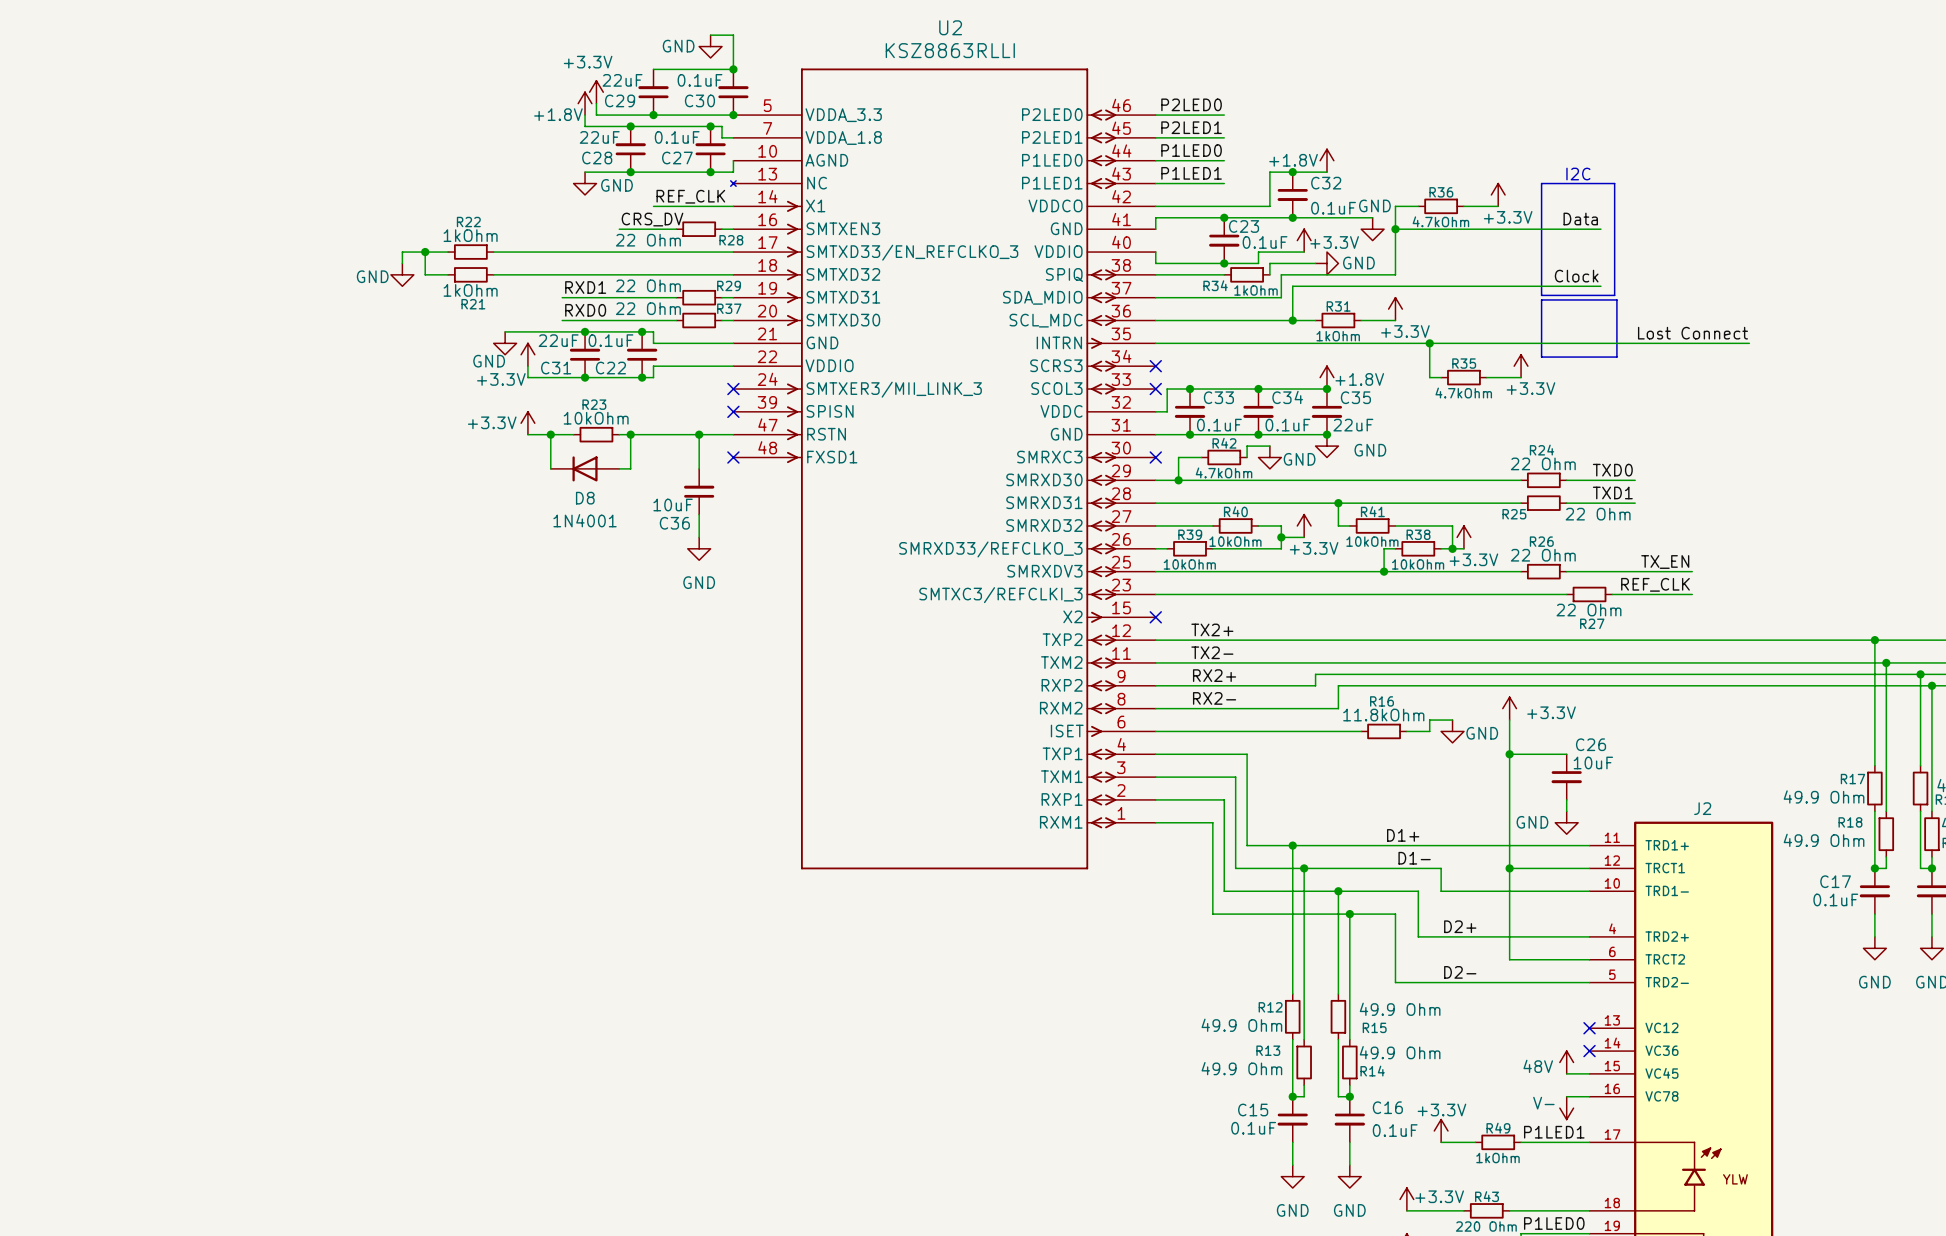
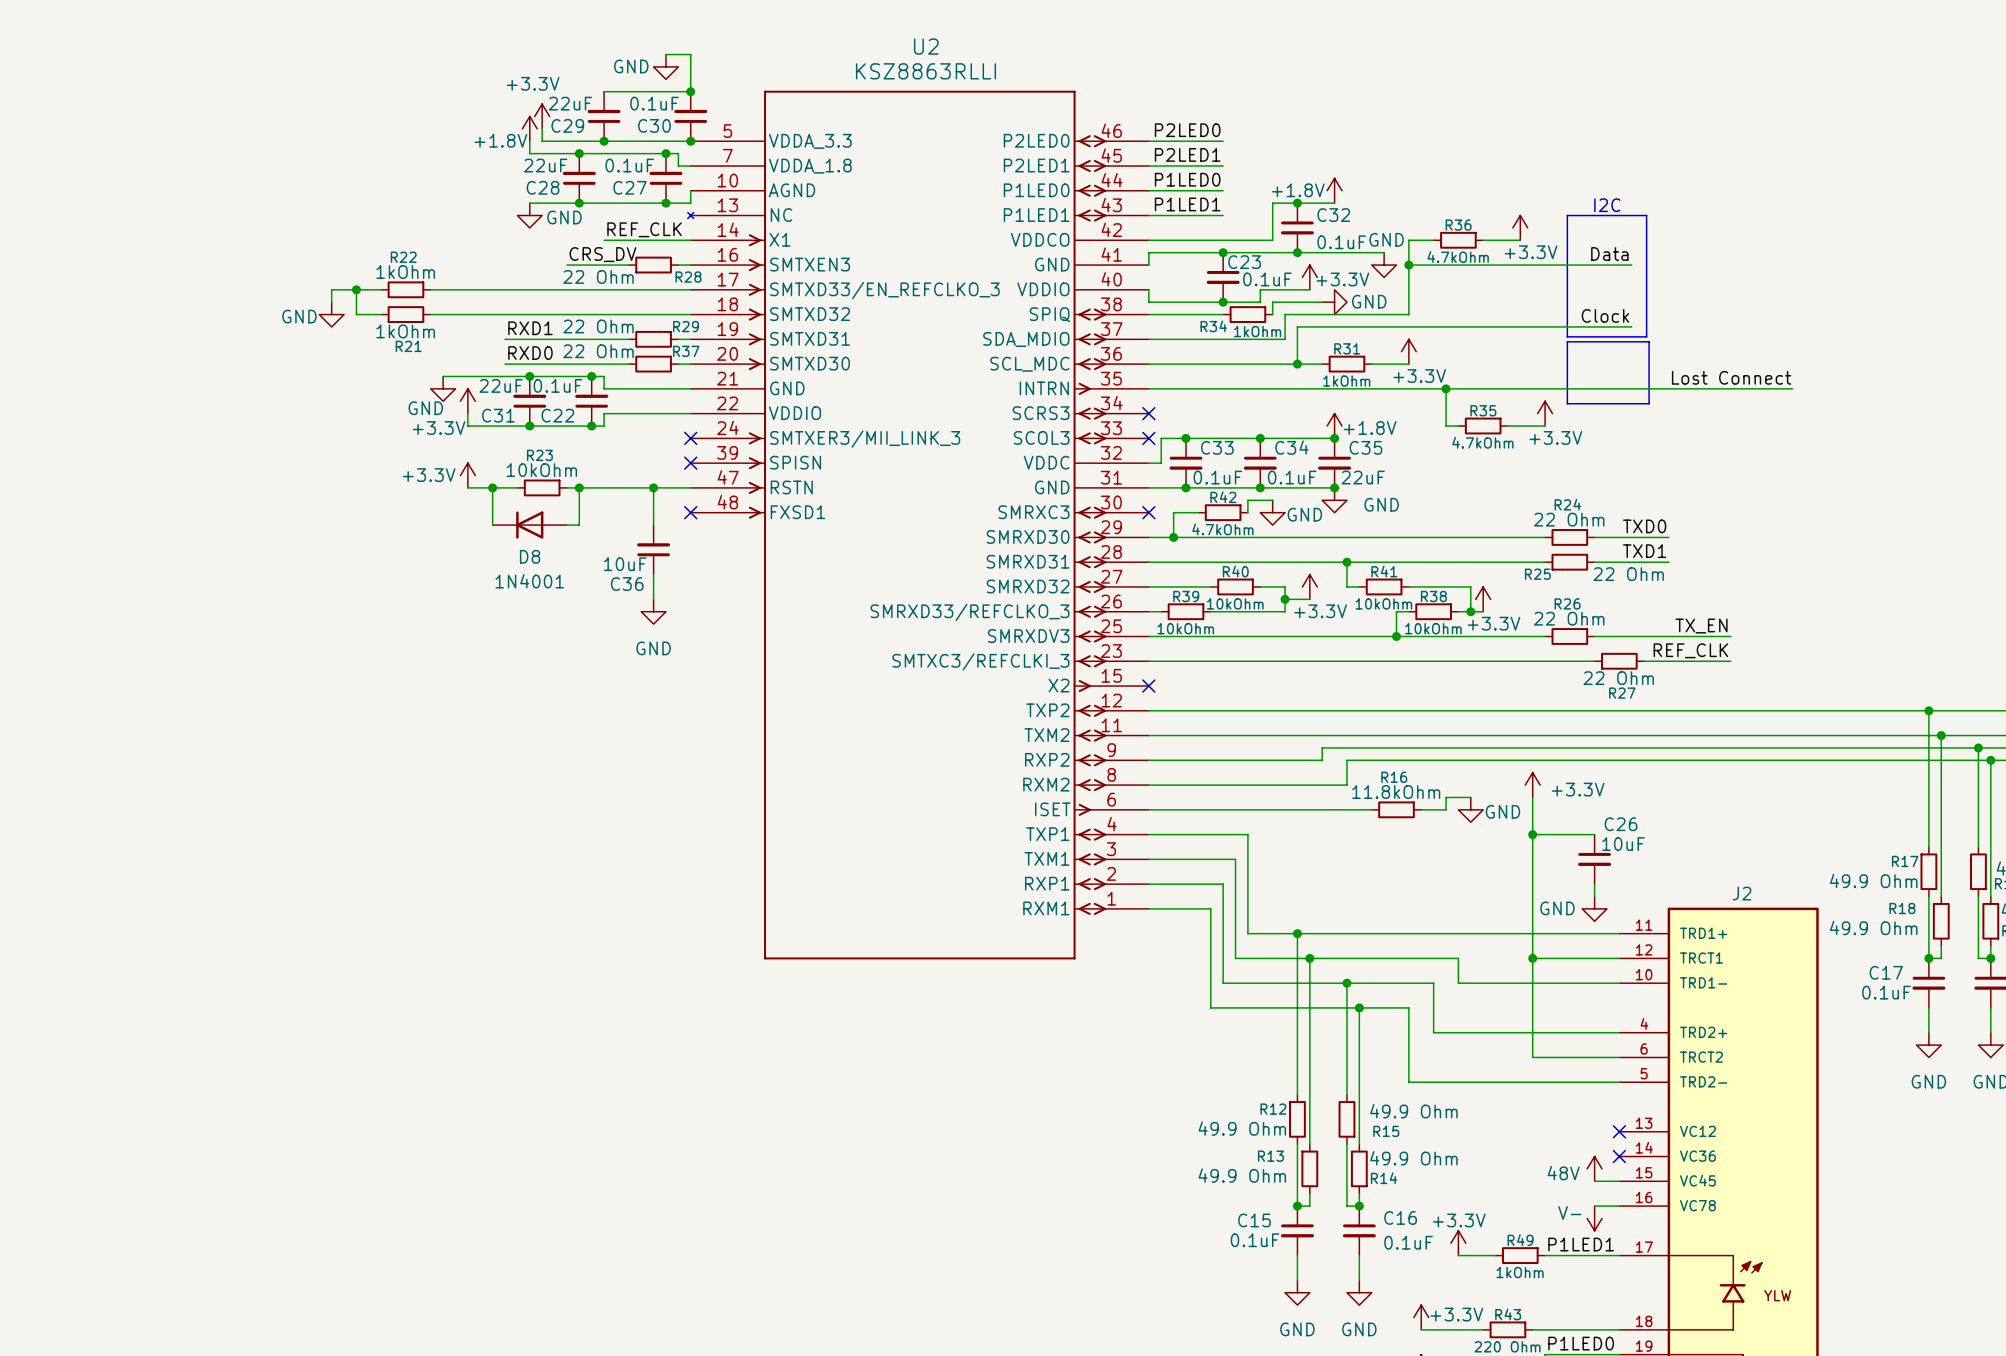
label: TX2+ (1212, 629) -> none
label: TX2- (1212, 652) -> none
label: RX2+ (1214, 675) -> none
label: RX2- (1214, 698) -> none
label: D1+ (1403, 835) -> none
label: D1- (1414, 858) -> none
label: D2+ (1460, 926) -> none
label: D2- (1460, 972) -> none

